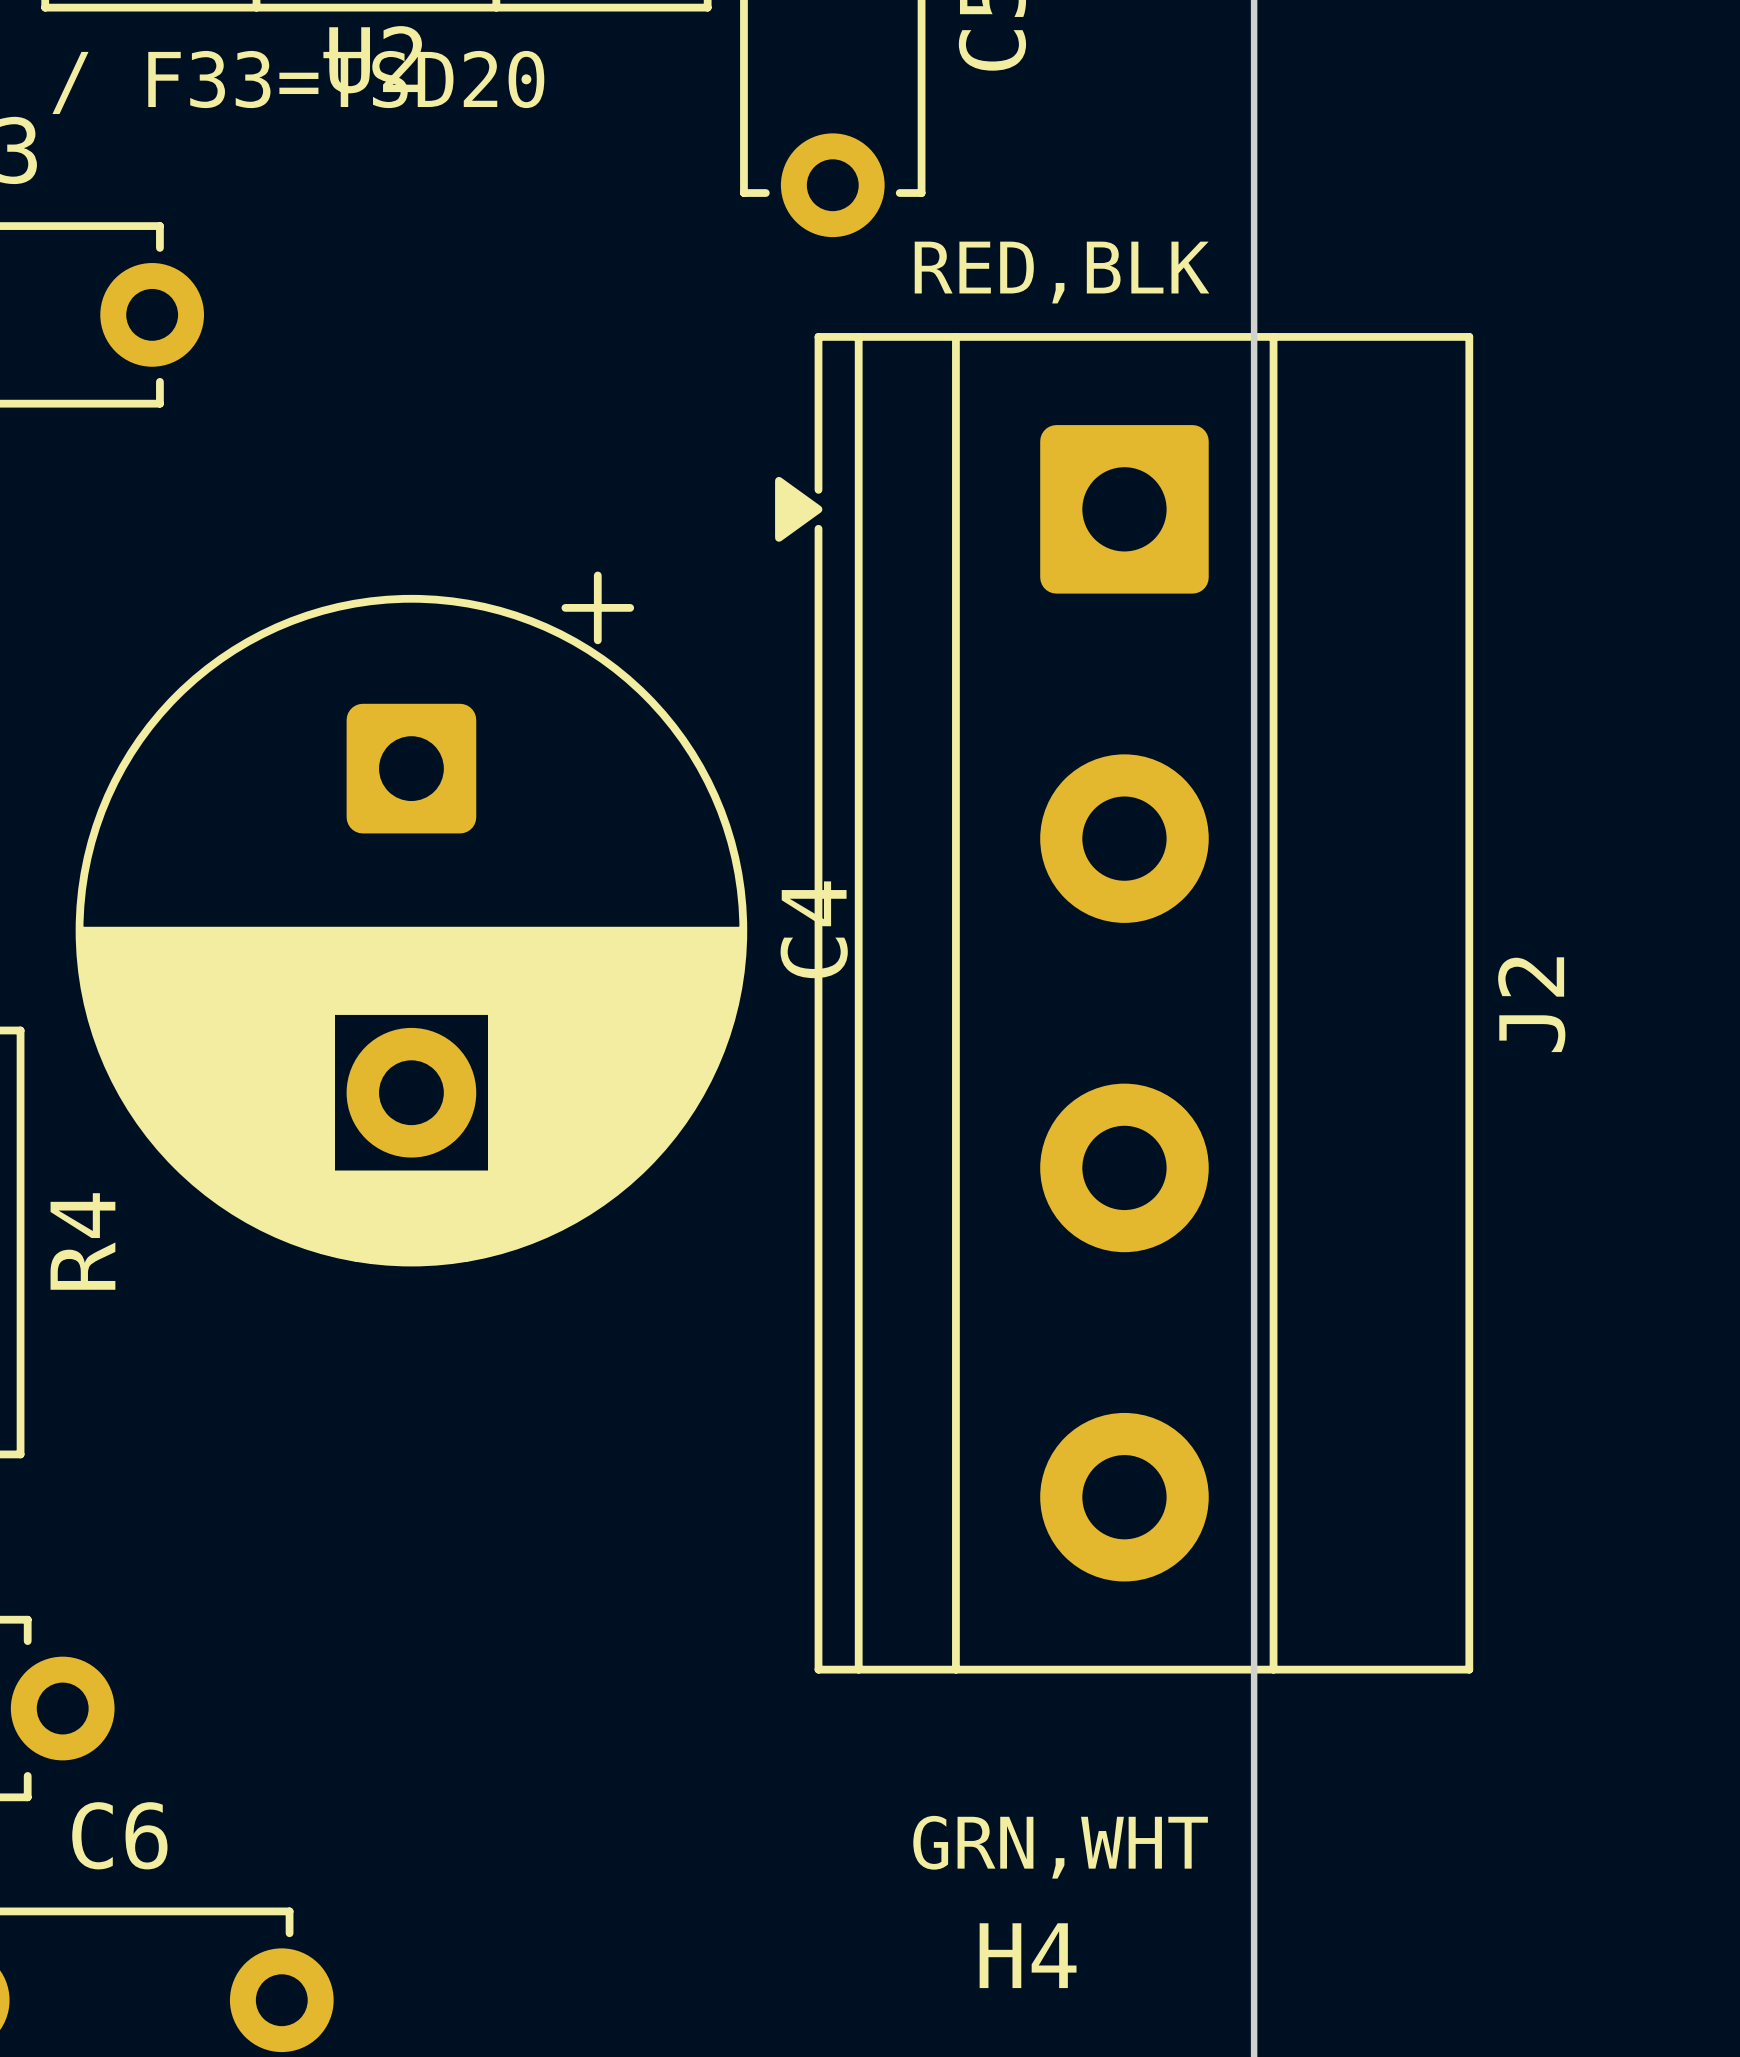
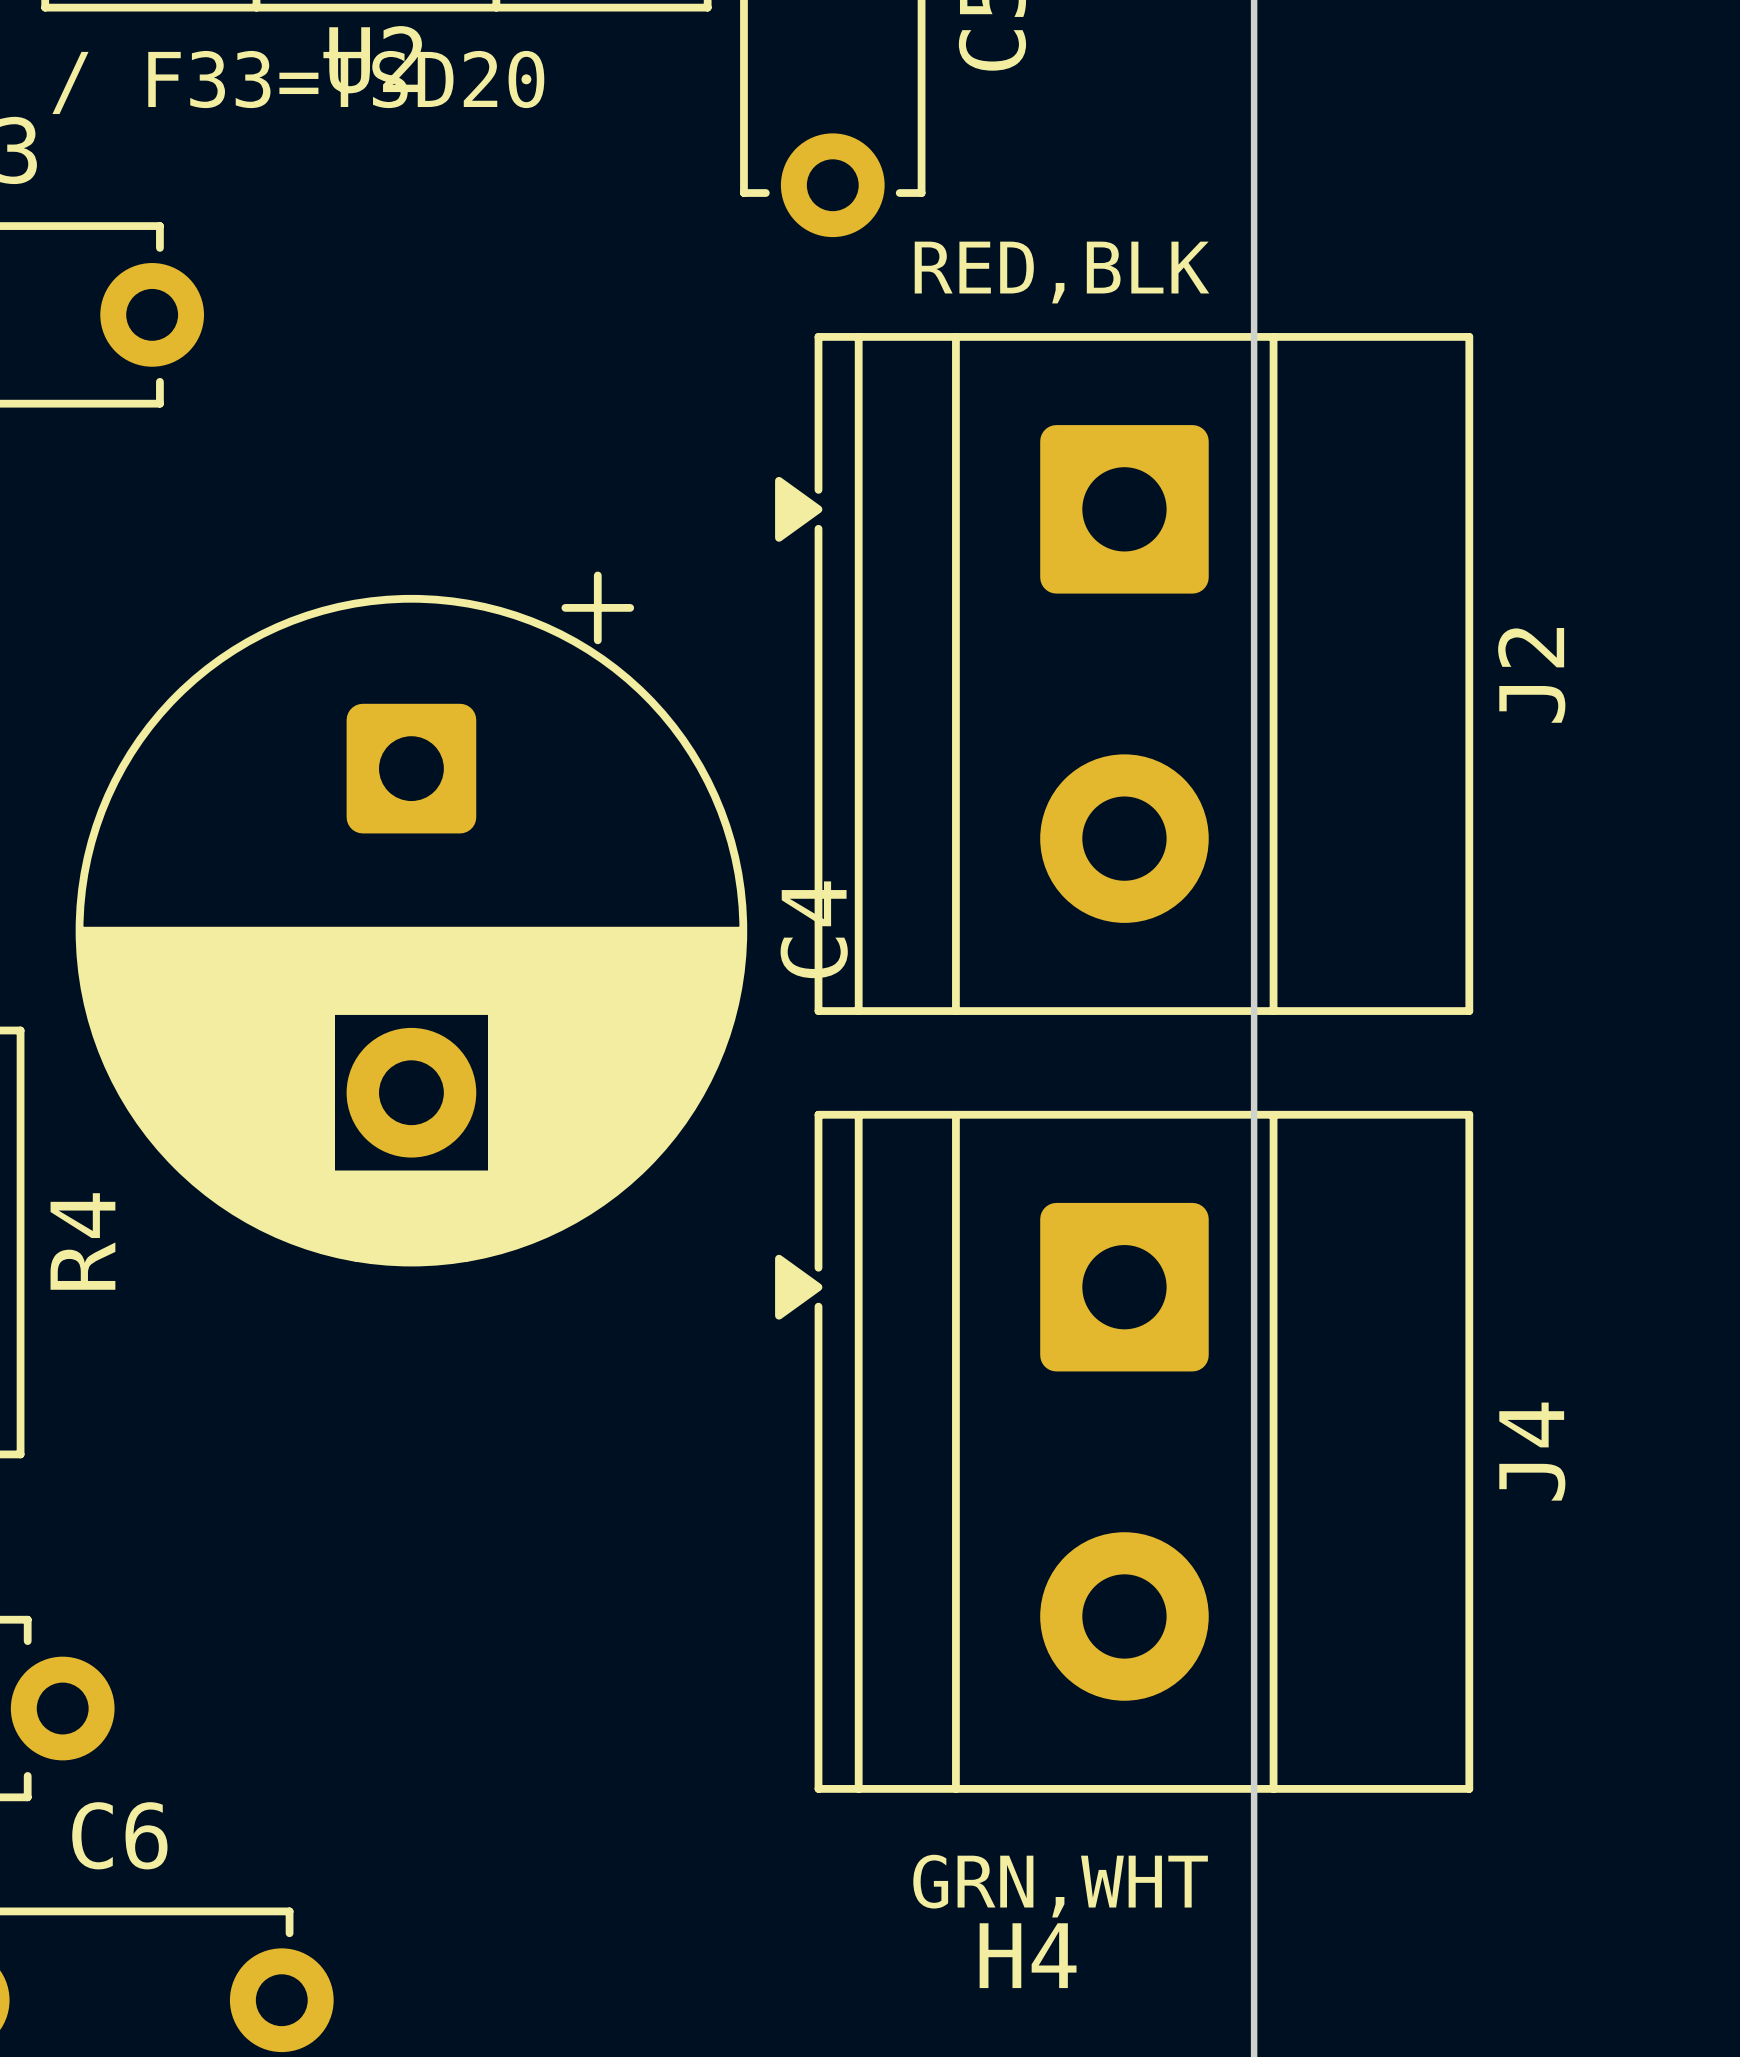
J2 footprint: [775, 333, 1474, 1674] -> [775, 333, 1474, 1015]
J4: none -> (1124, 1451)
text position: GRN,WHT (1060, 1847) -> GRN,WHT (1060, 1886)

